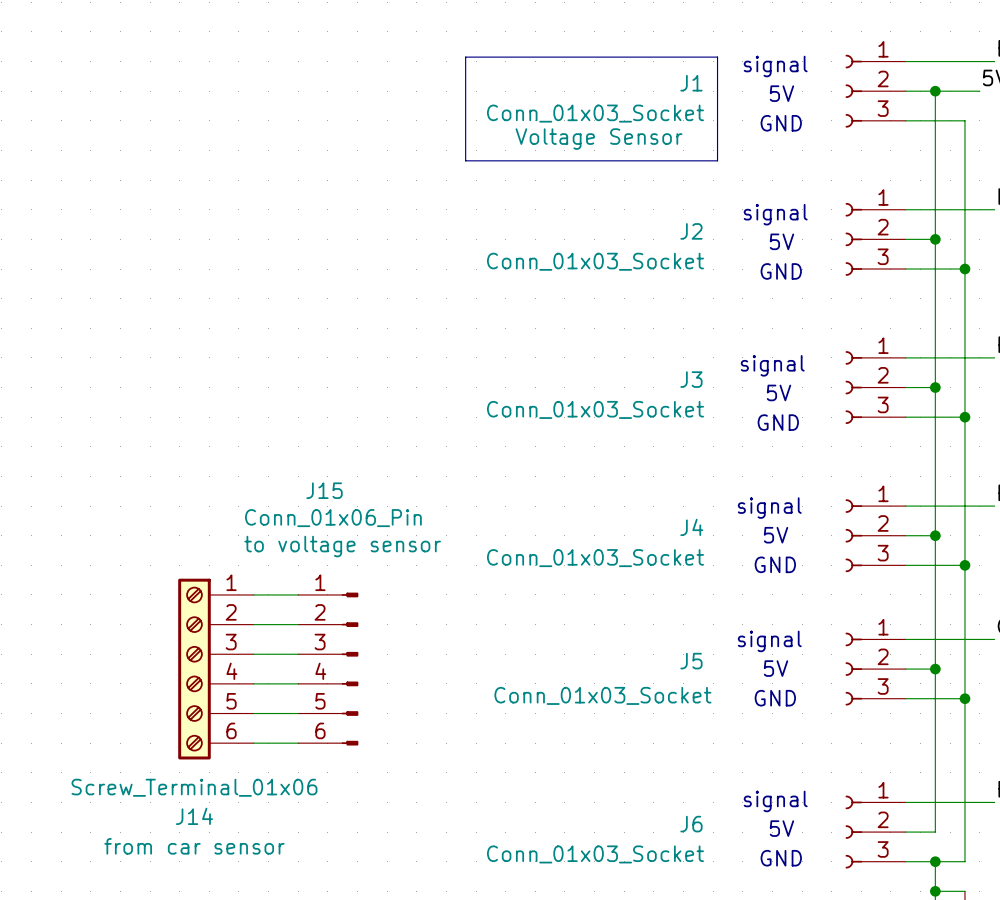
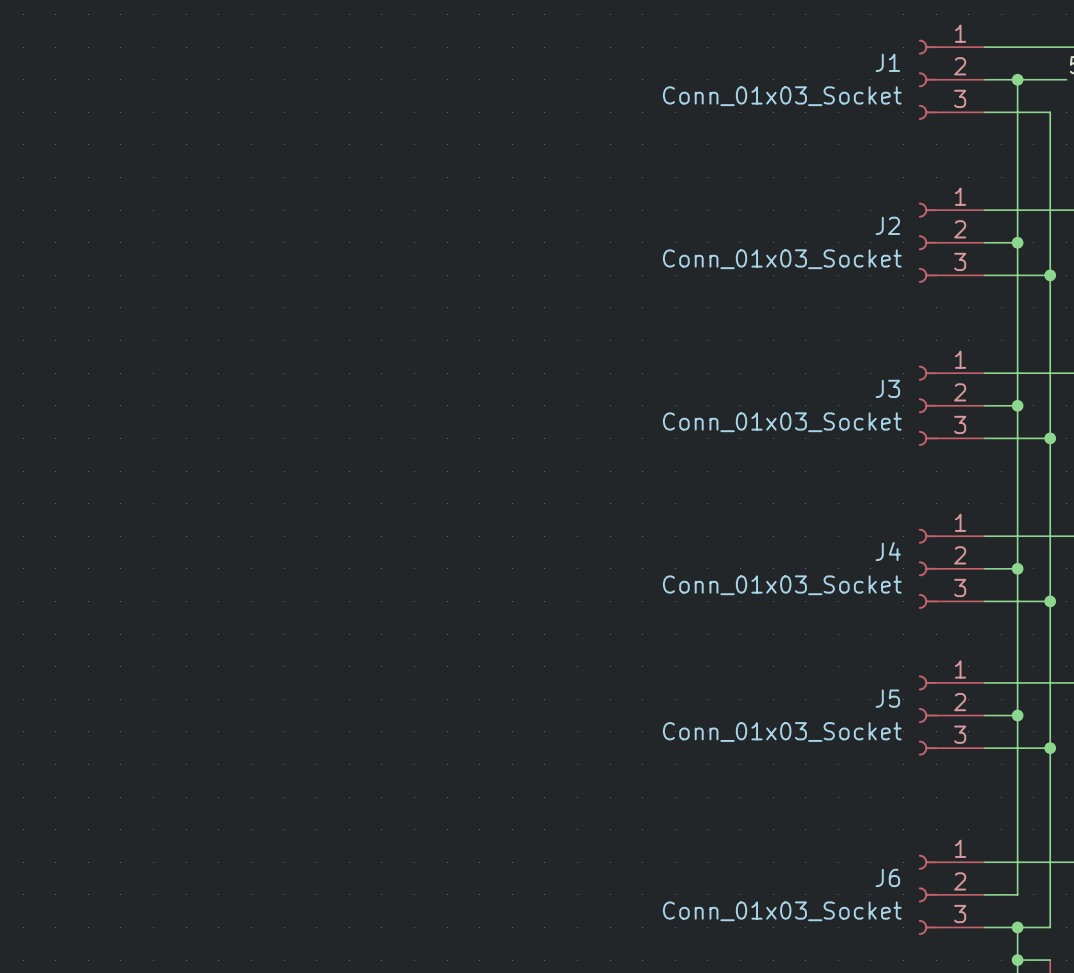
line: (465, 57) (717, 57) (717, 160) (465, 160) (465, 57) -> none
text: signal (775, 66) -> none
J1 name position: J1 (691, 83) -> J1 (887, 62)
text: 5V (781, 93) -> none
J1 value position: Conn_01x03_Socket (595, 113) -> Conn_01x03_Socket (782, 96)
text: GND (781, 123) -> none
J1 text: Voltage Sensor (599, 139) -> none
text: signal (775, 214) -> none
J2 name position: J2 (691, 231) -> J2 (887, 225)
text: 5V (781, 241) -> none
J2 value position: Conn_01x03_Socket (595, 261) -> Conn_01x03_Socket (782, 259)
text: GND (781, 271) -> none
text: signal (772, 365) -> none
J3 name position: J3 (691, 379) -> J3 (887, 388)
text: 5V (778, 392) -> none
J3 value position: Conn_01x03_Socket (595, 409) -> Conn_01x03_Socket (782, 422)
text: GND (778, 422) -> none
text: signal (769, 508) -> none
J4 name position: J4 (691, 527) -> J4 (888, 551)
text: 5V (776, 535) -> none
J4 value position: Conn_01x03_Socket (595, 558) -> Conn_01x03_Socket (782, 585)
text: GND (775, 564) -> none
wire: (253, 594) (298, 594) -> none
wire: (253, 624) (298, 624) -> none
text: signal (769, 641) -> none
wire: (253, 654) (298, 654) -> none
J5 name position: J5 (691, 661) -> J5 (887, 698)
text: 5V (776, 668) -> none
J14: Screw_Terminal_01x06 (215, 669) -> none
J15: Conn_01x06_Pin (328, 669) -> none
wire: (253, 683) (298, 683) -> none
J5 value position: Conn_01x03_Socket (602, 695) -> Conn_01x03_Socket (782, 732)
text: GND (775, 698) -> none
wire: (253, 713) (298, 713) -> none
wire: (253, 743) (298, 743) -> none
text: signal (775, 801) -> none
J6 name position: J6 (691, 824) -> J6 (887, 877)
text: 5V (781, 828) -> none
J6 value position: Conn_01x03_Socket (595, 854) -> Conn_01x03_Socket (782, 911)
text: GND (781, 858) -> none

